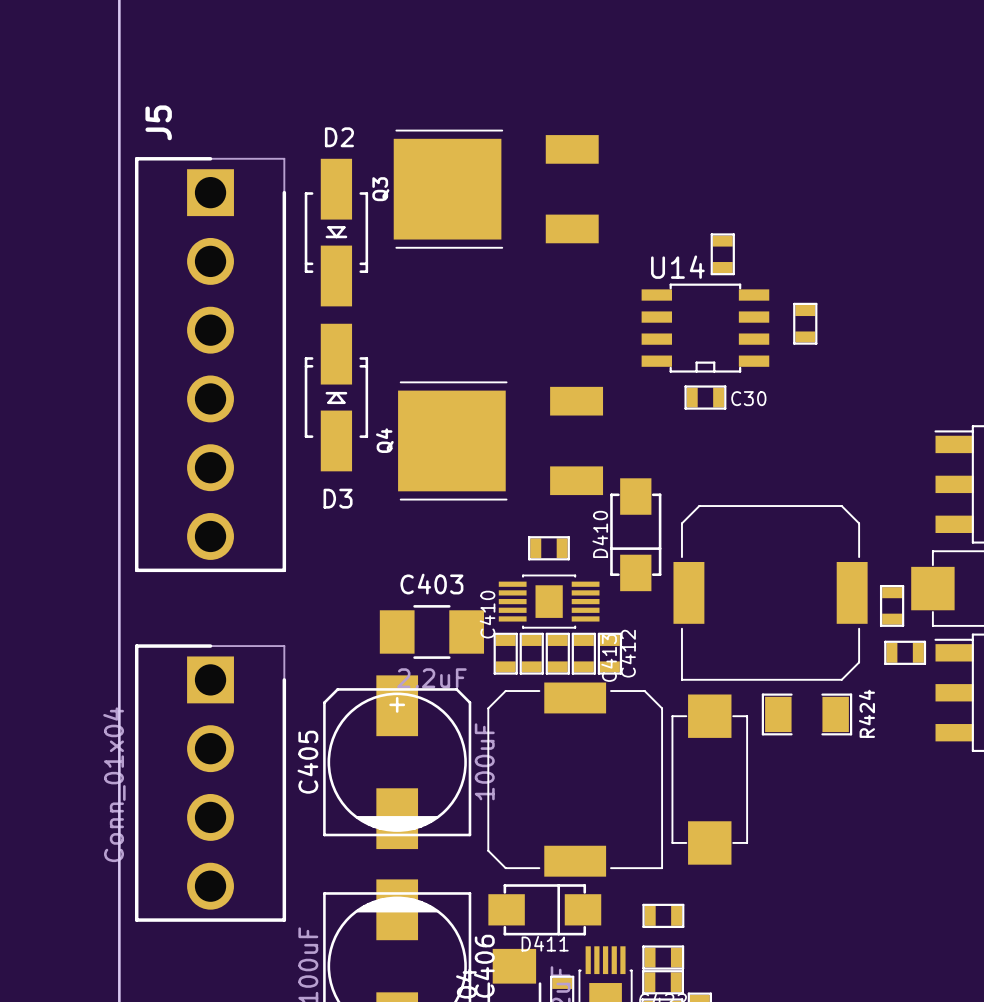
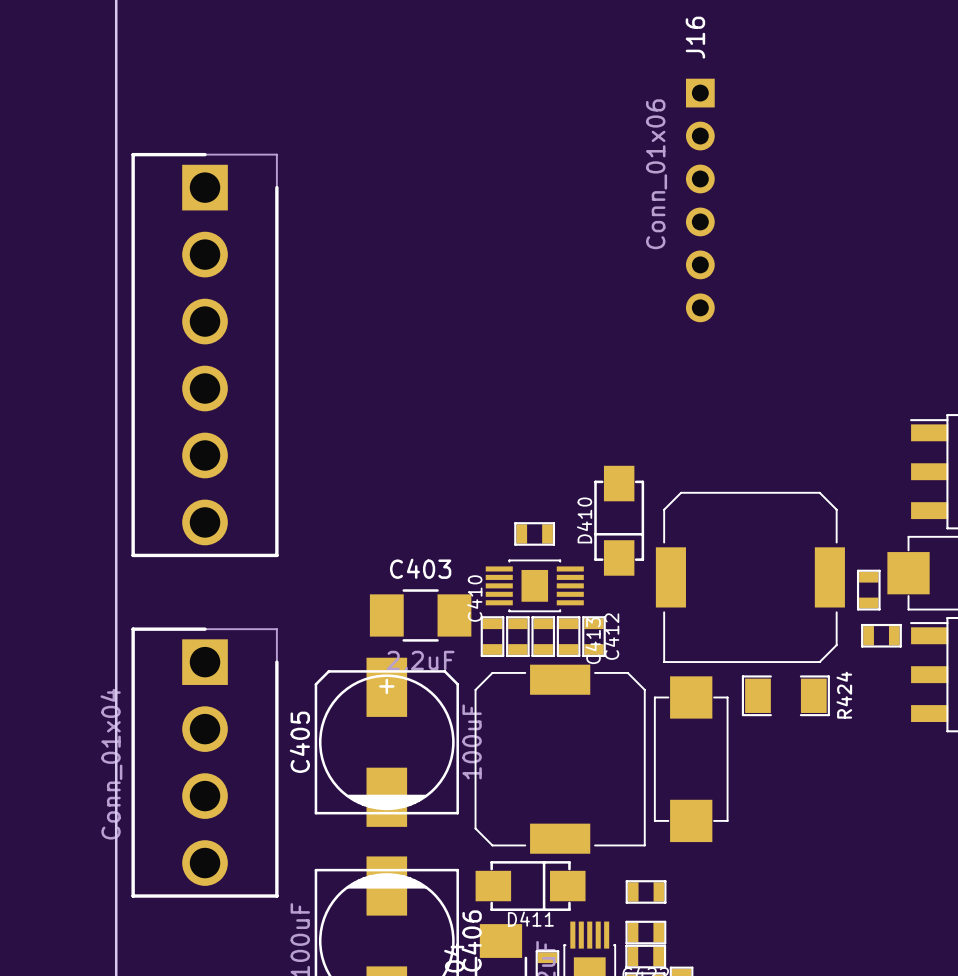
J5 name: J5 (158, 122) -> none
Q3: (496, 189) -> none
J16: none -> Conn_01x06 (700, 200)
D2: (336, 232) -> none
part: (722, 254) -> none
part: (805, 323) -> none
U14: (705, 328) -> none
D3: (336, 397) -> none
C30: (705, 397) -> none
Q4: (500, 440) -> none

